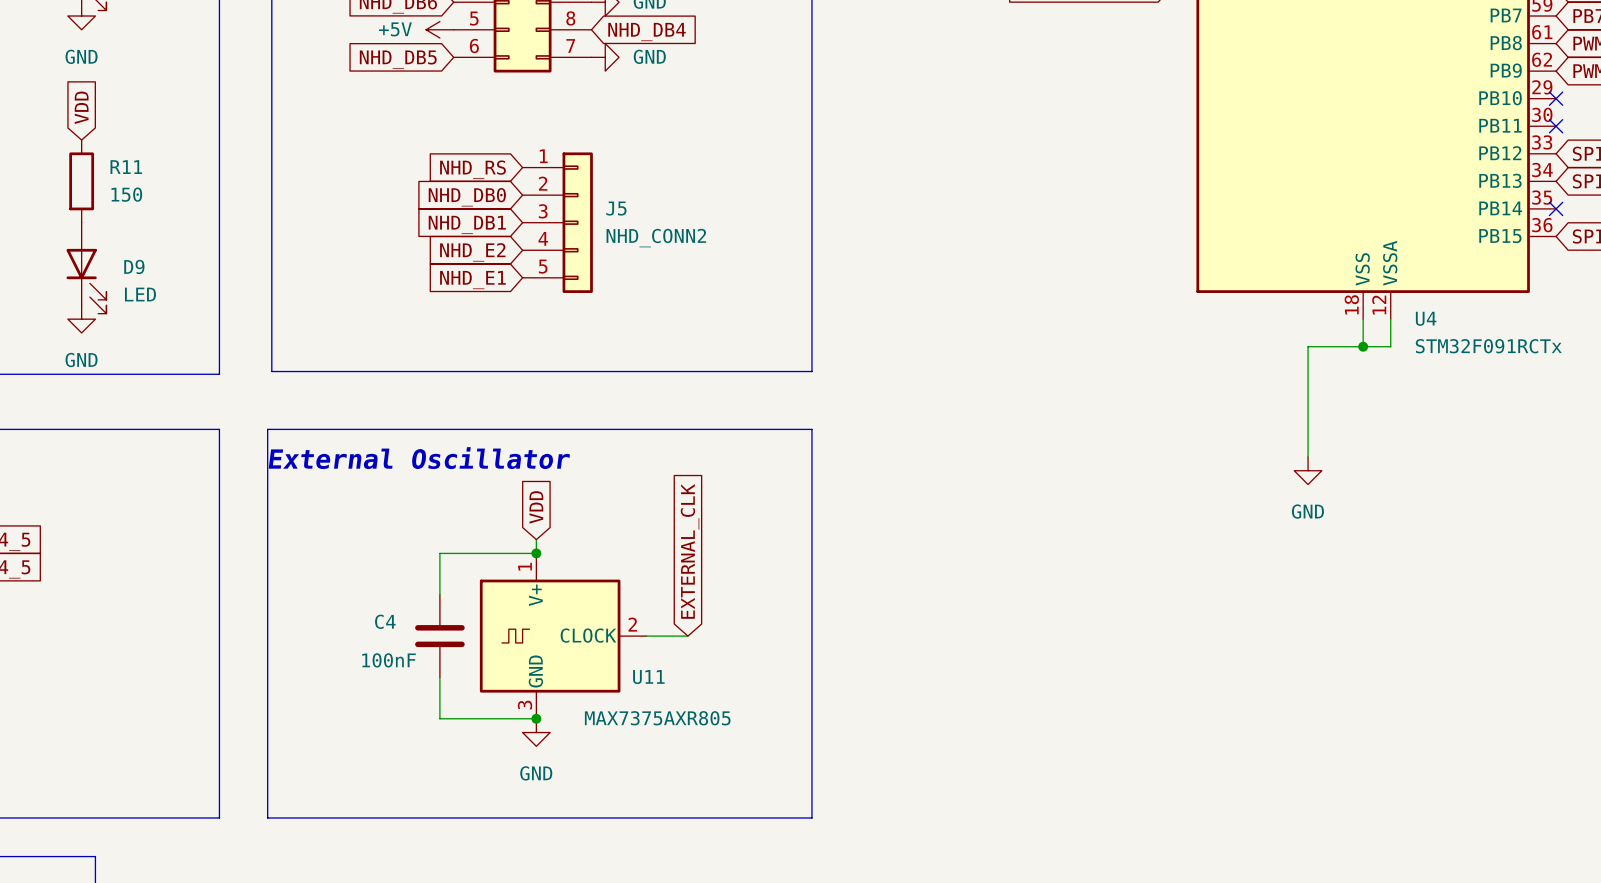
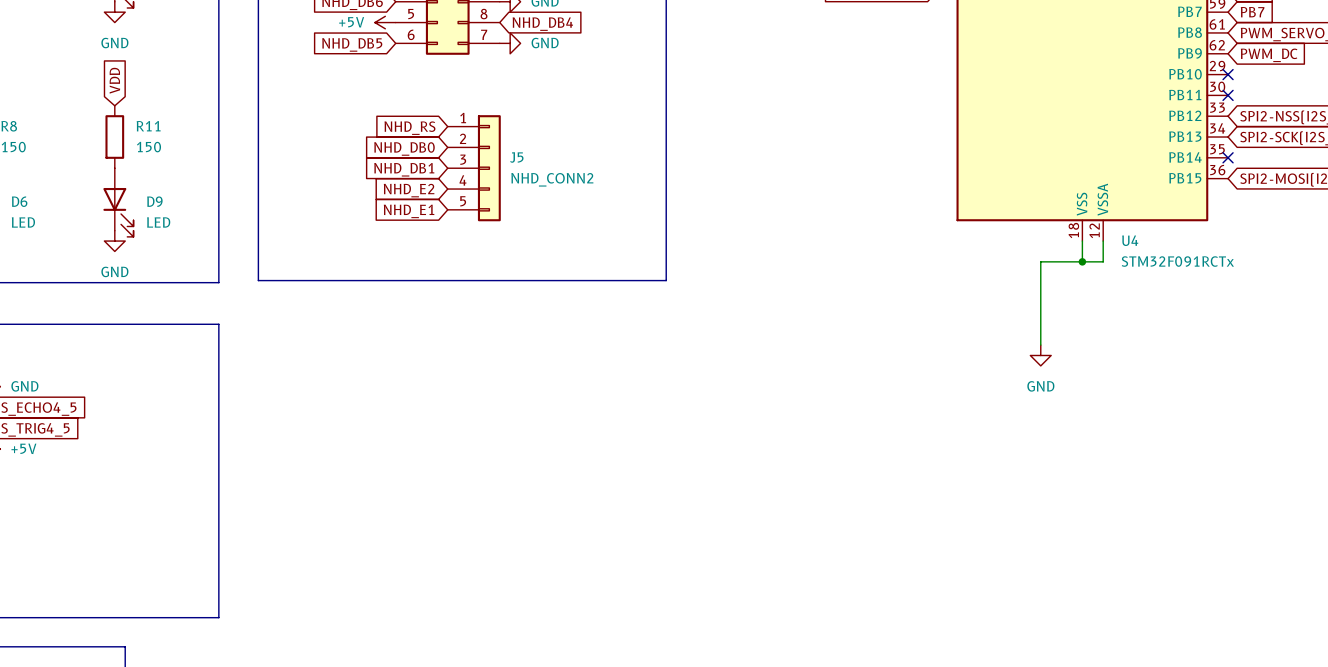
line: (267, 429) (811, 429) (811, 817) (267, 817) (267, 429) -> none
text: External Oscillator (419, 458) -> none
global label: VDD (536, 507) -> none
wire: (536, 539) (536, 553) (439, 553) (439, 594) -> none
global label: EXTERNAL_CLK (690, 551) -> none
junction: (536, 553) -> none
C4: 100nF (439, 636) -> none
U11: MAX7375AXR805 (563, 636) -> none
wire: (646, 636) (687, 636) -> none
wire: (439, 677) (439, 718) (536, 718) -> none
junction: (536, 718) -> none
power symbol: GND (536, 732) -> none

